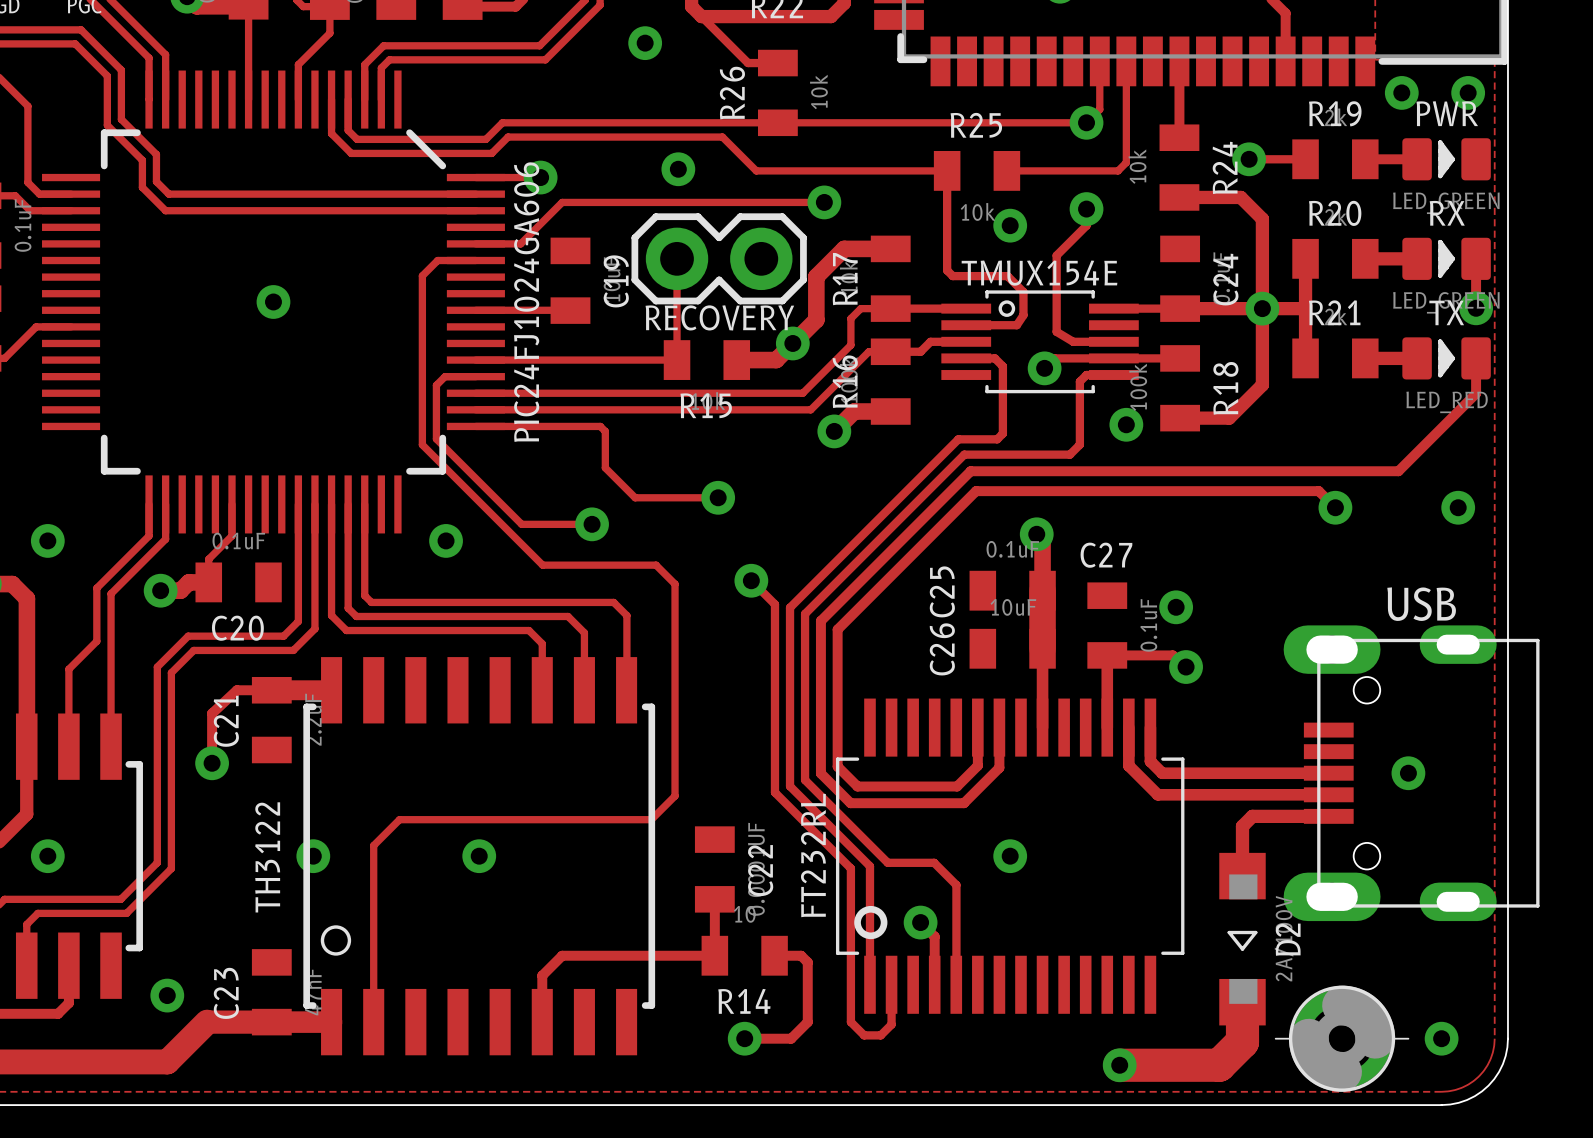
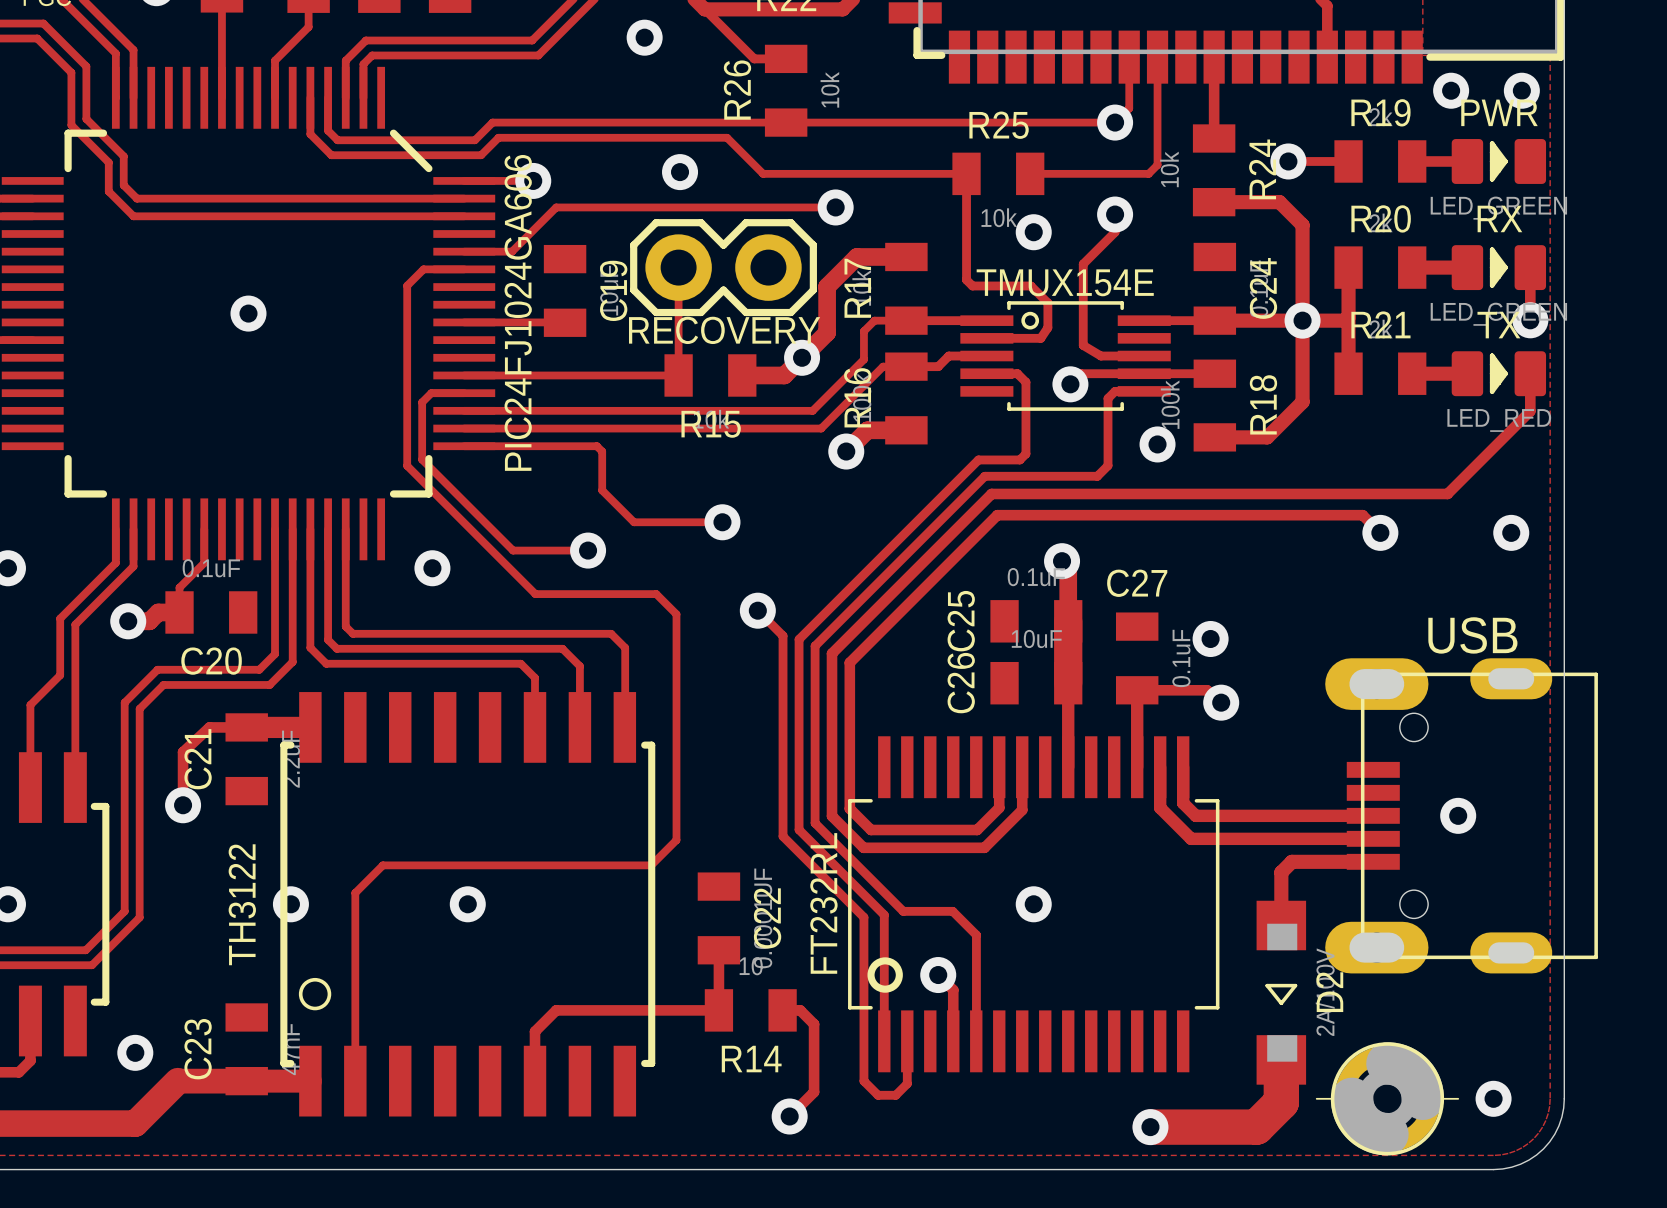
track: (791, 955) (801, 955) (807, 962) (807, 1022) (791, 1038) (744, 1038) -> (800, 1010) (814, 1024) (814, 1092) (789, 1116)
via position: (744, 1038) -> (789, 1116)

